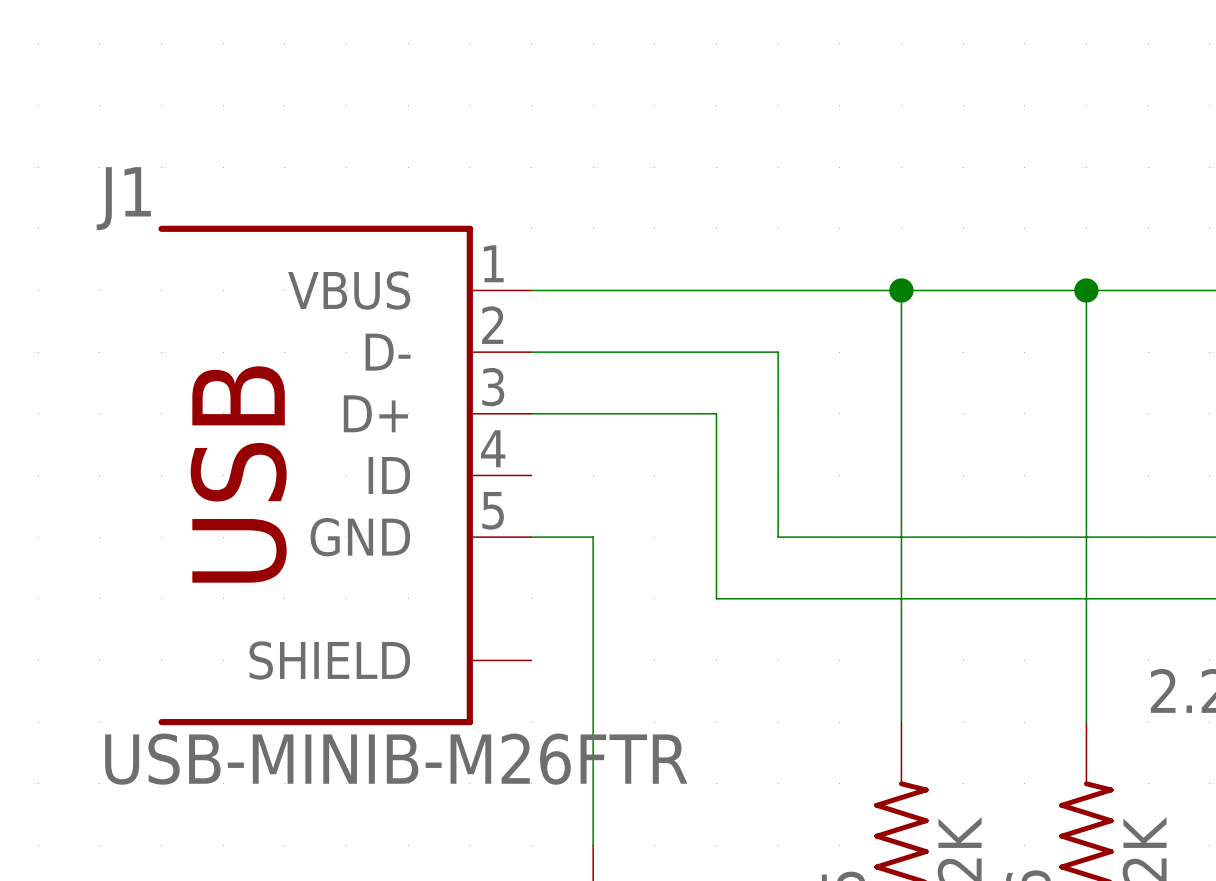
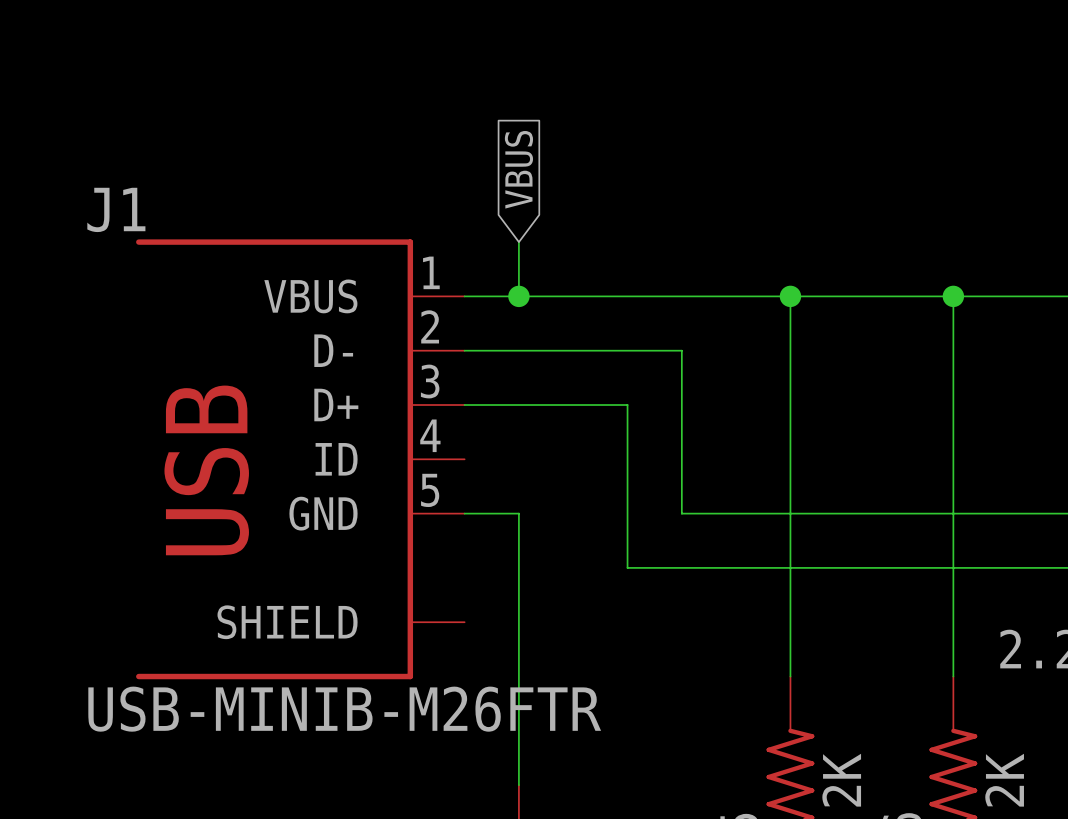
global label: none -> VBUS (518, 169)
wire: none -> (518, 242) (518, 296)
junction: none -> (518, 296)

